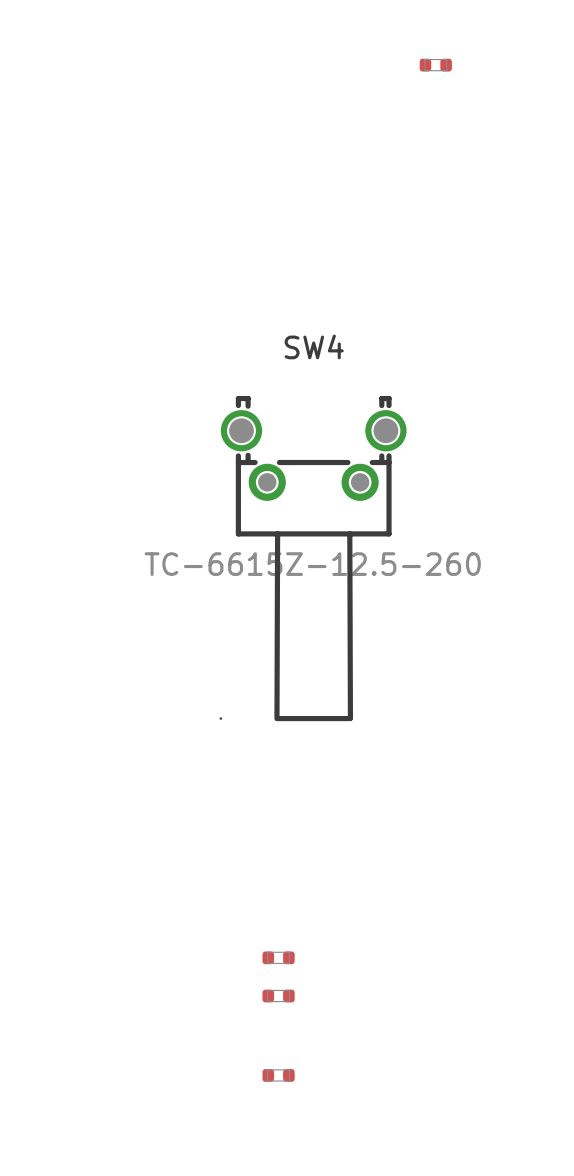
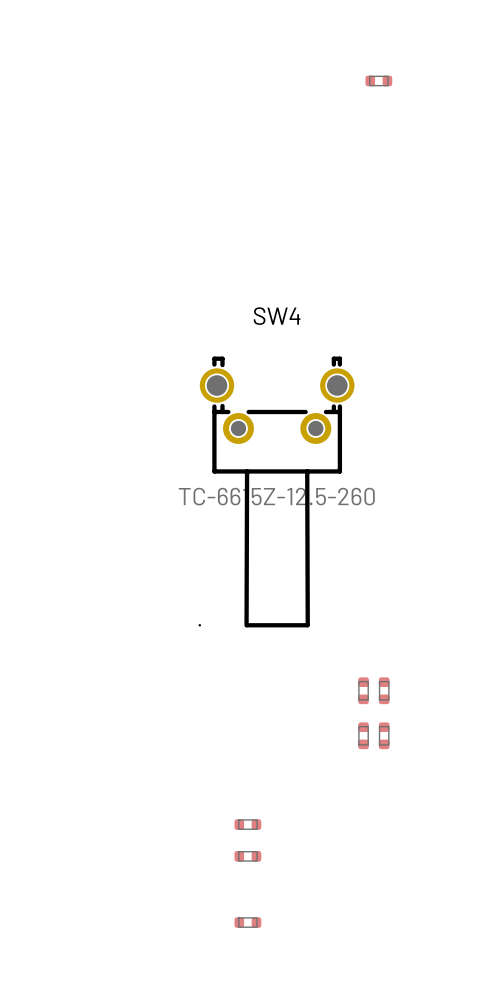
part: none -> (363, 690)
part: none -> (384, 690)
part: none -> (363, 735)
part: none -> (384, 735)

